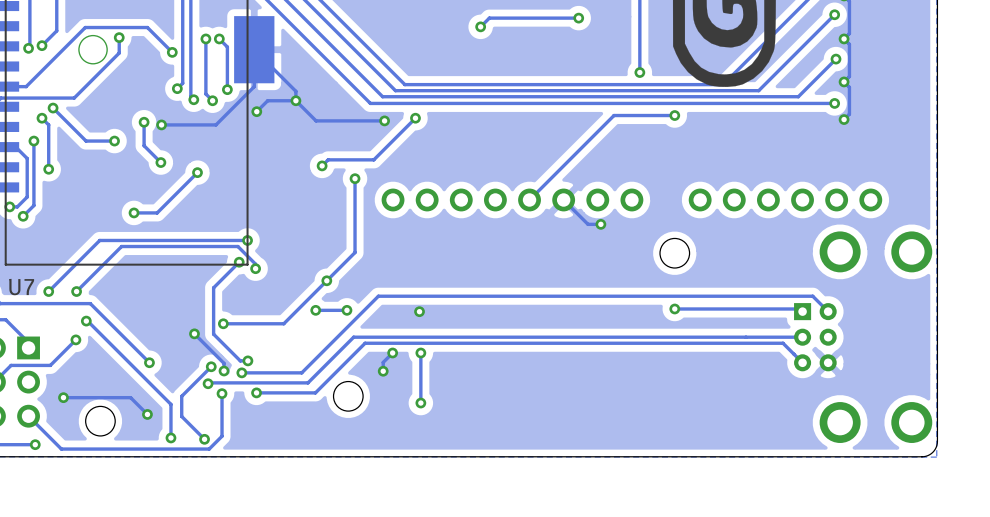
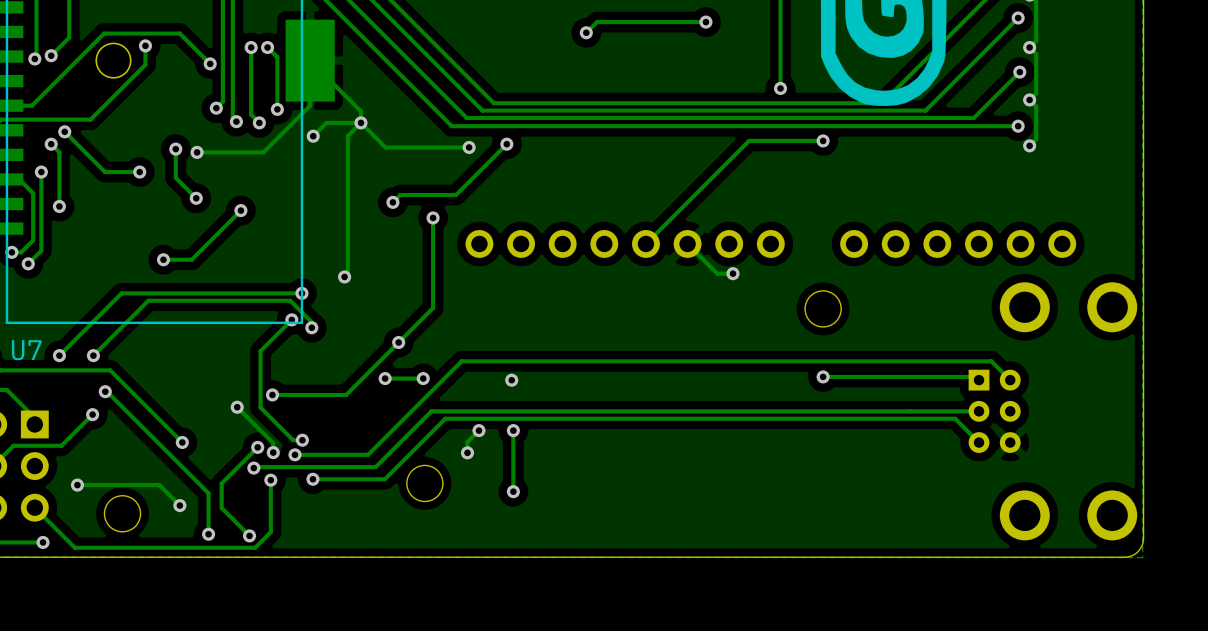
track: none -> (360, 122) (347, 136) (347, 273) (344, 276)
via: none -> (344, 276)

